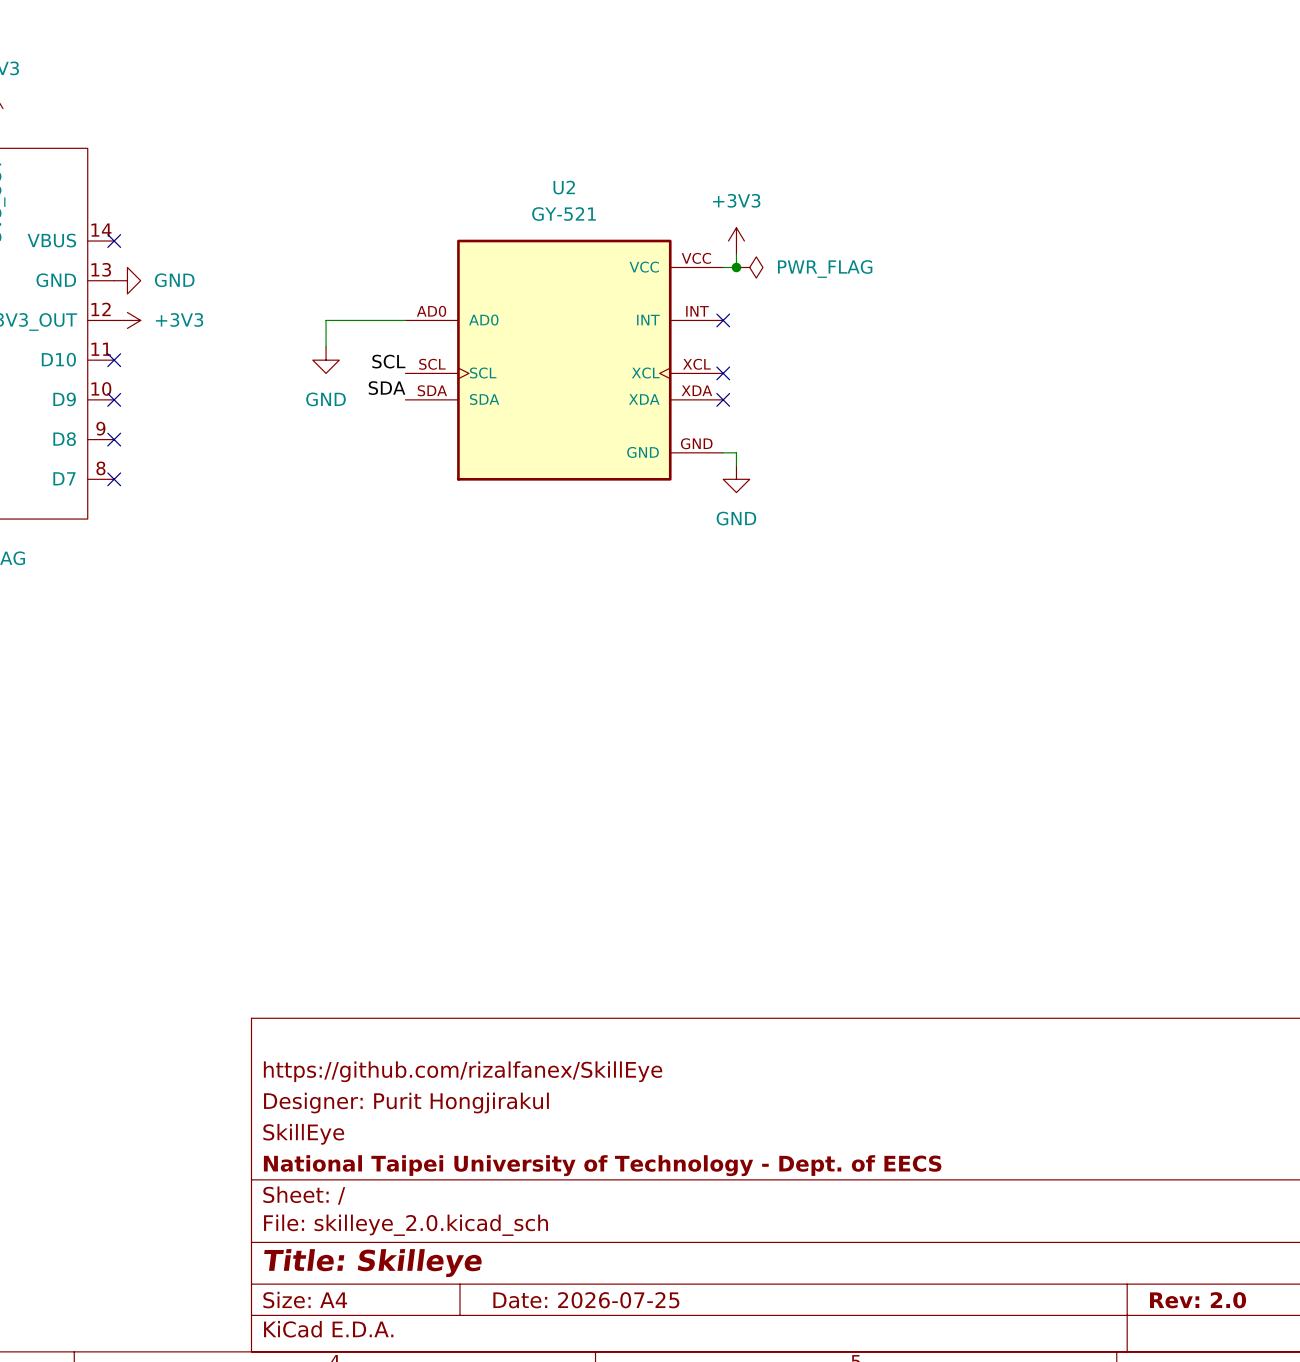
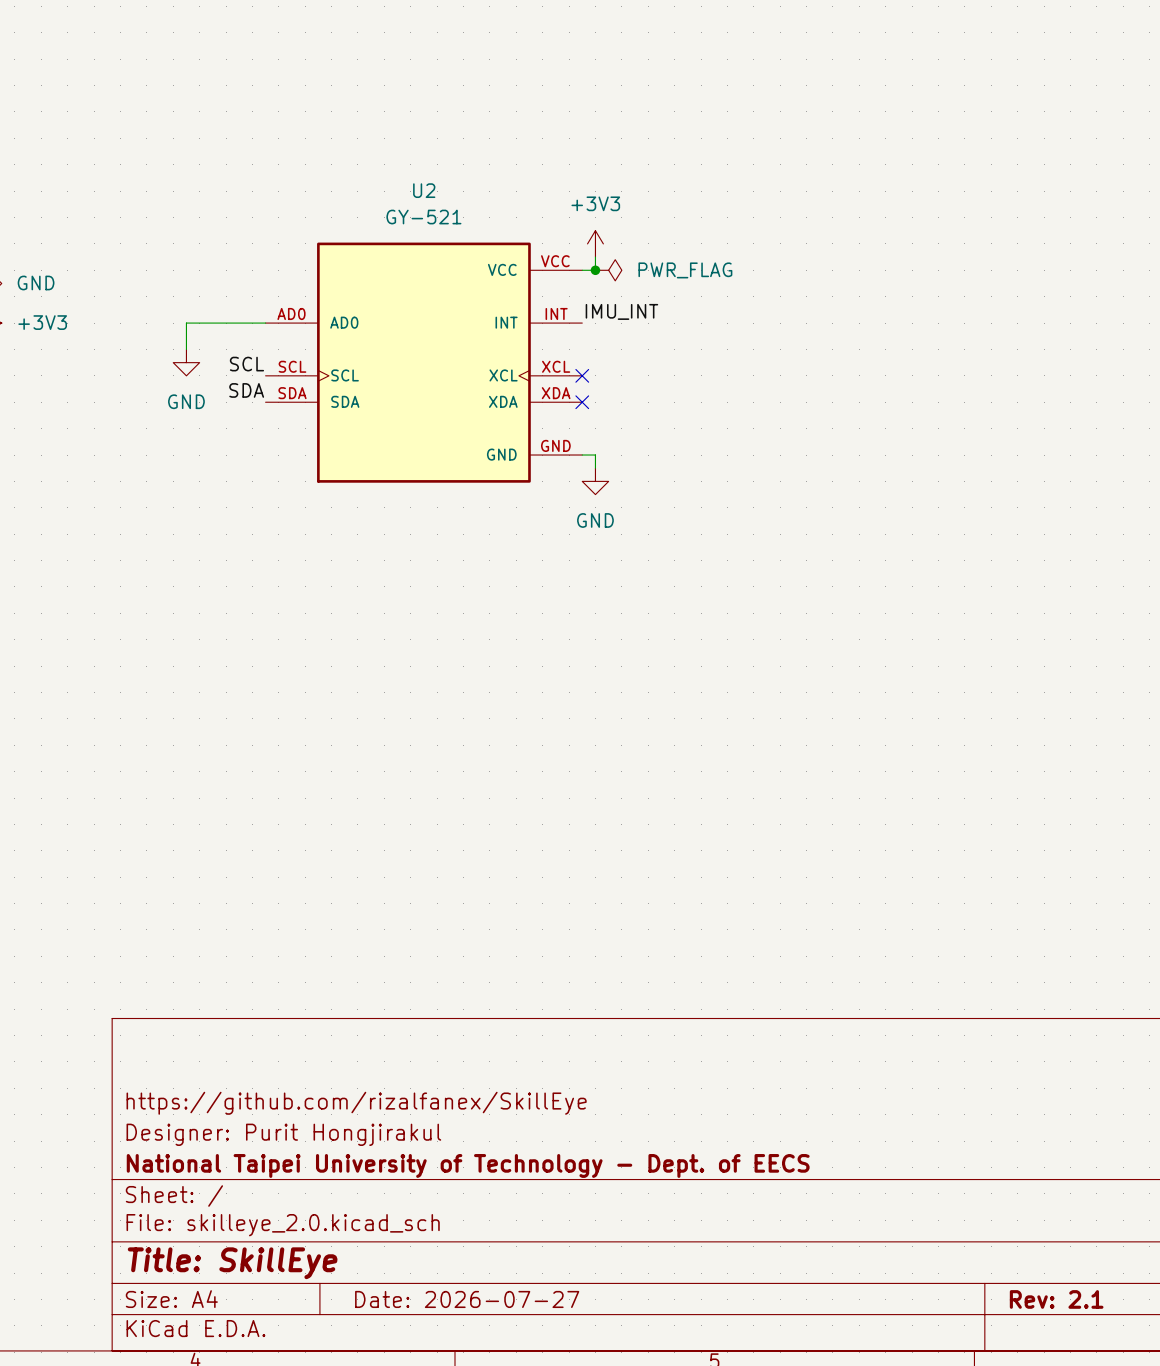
label: none -> IMU_INT (621, 311)
no-connect mark: (723, 320) -> none
title block: https://github.com/rizalfanex/SkillEye (463, 1071) -> none
title block: Designer: Purit Hongjirakul (406, 1103) -> https://github.com/rizalfanex/SkillEye (356, 1103)
title block: SkillEye (303, 1134) -> Designer: Purit Hongjirakul (283, 1134)
title block: Title: Skilleye (373, 1263) -> Title: SkillEye (232, 1263)
title block: Date: 2026-07-25 (586, 1300) -> Date: 2026-07-27 (467, 1299)
title block: Rev: 2.0 (1198, 1300) -> Rev: 2.1 (1056, 1299)

